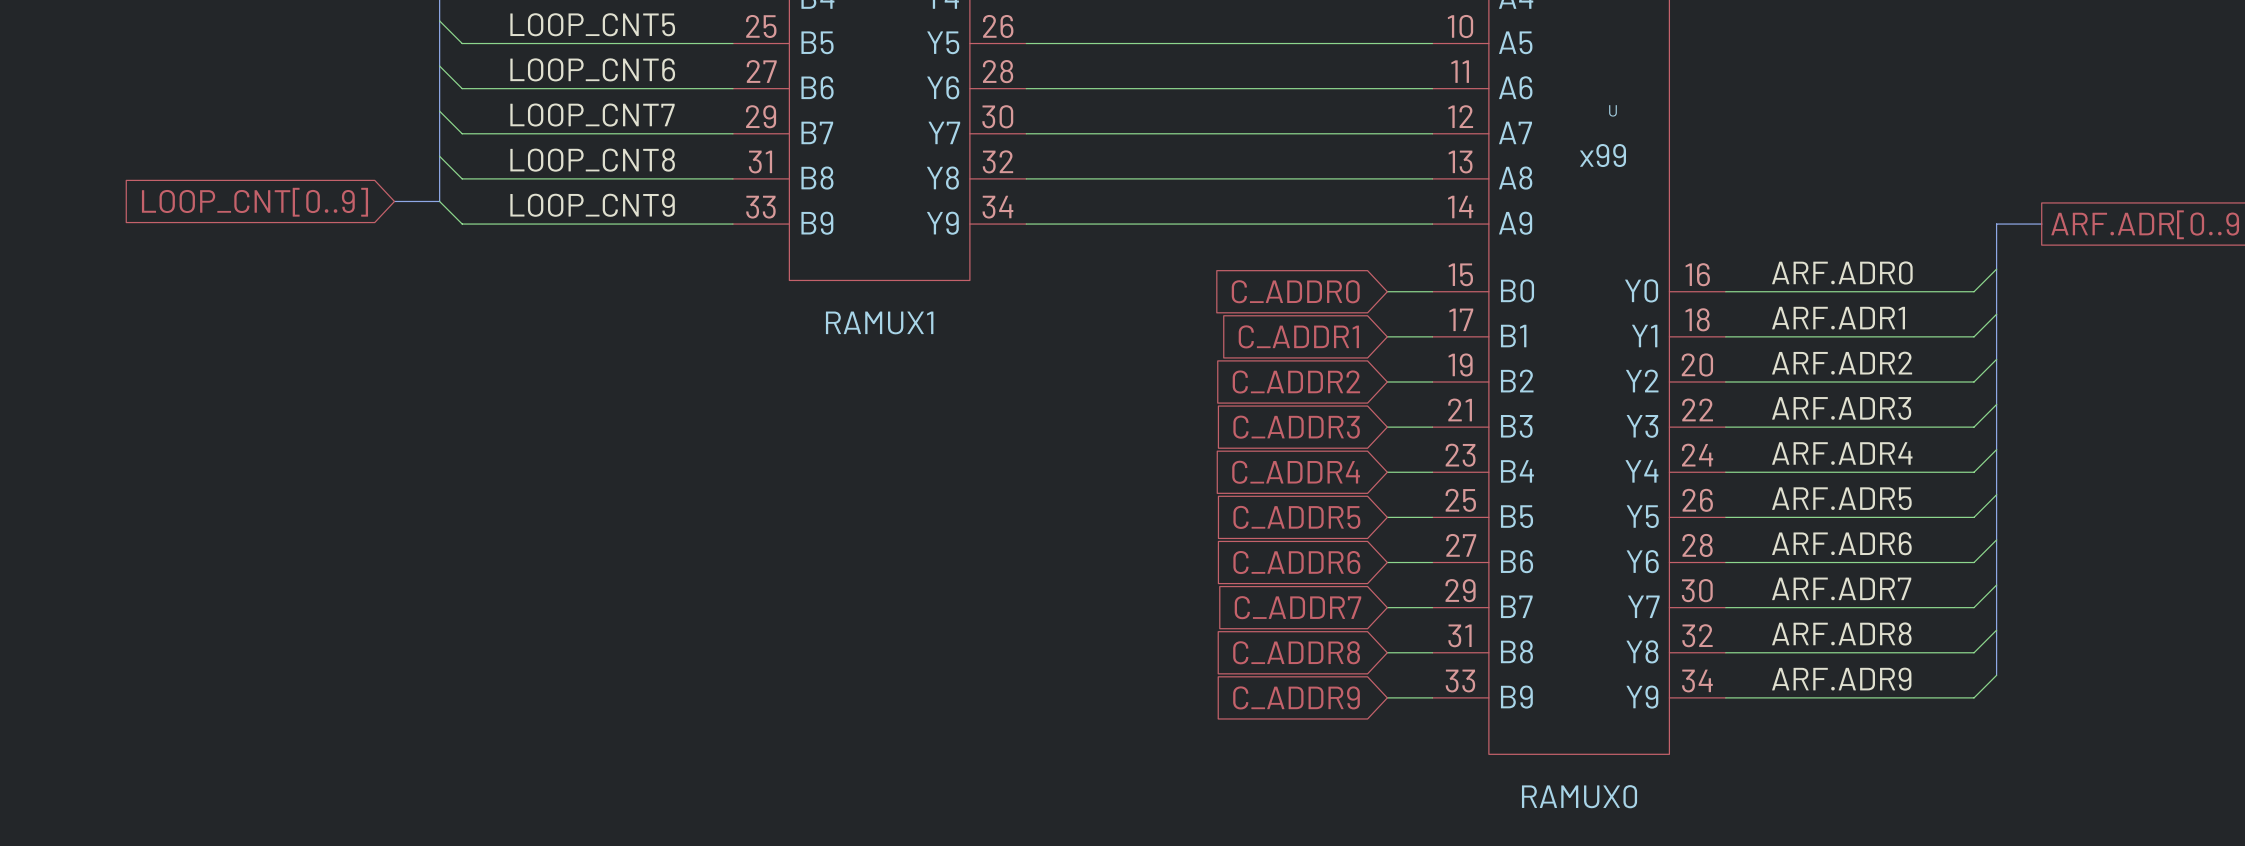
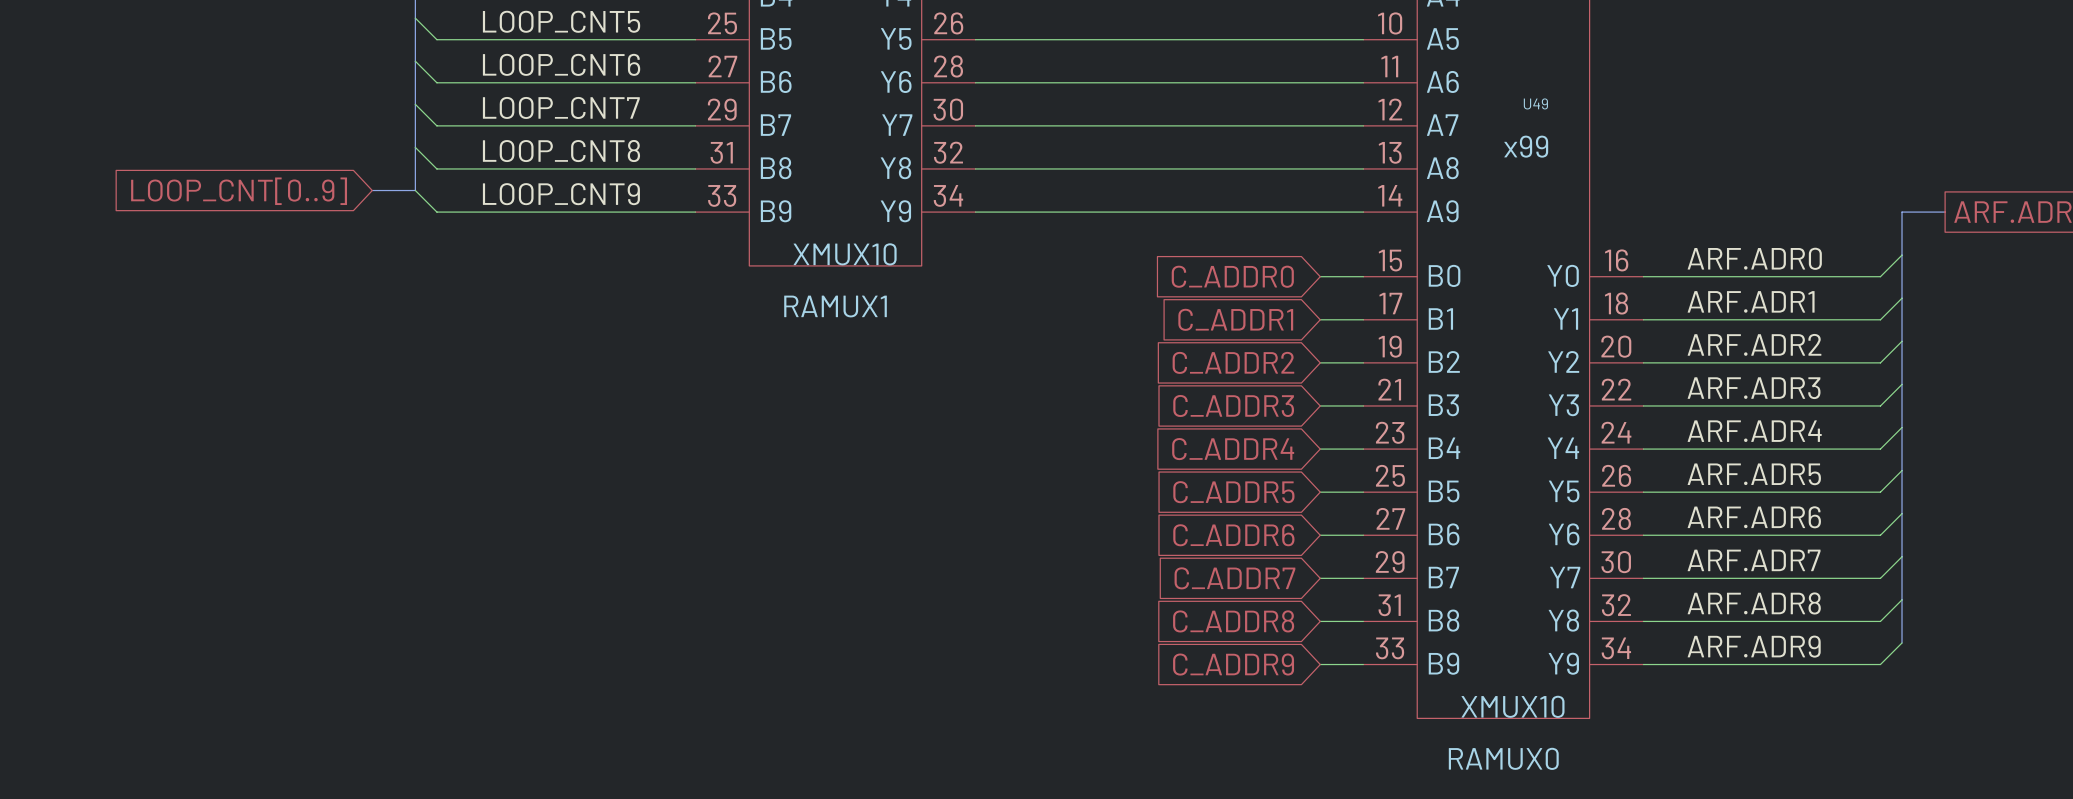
U name: U (1612, 110) -> U49 (1535, 103)
part value: none -> XMUX10 (845, 254)
U value: none -> XMUX10 (1512, 706)

